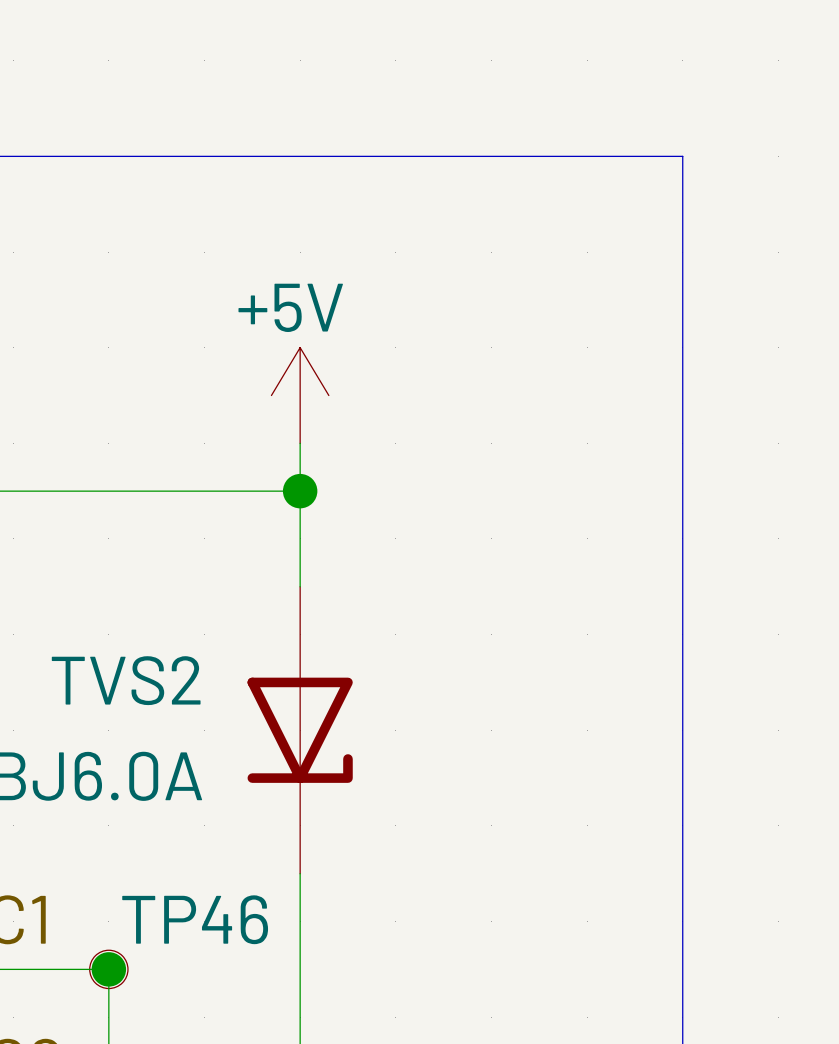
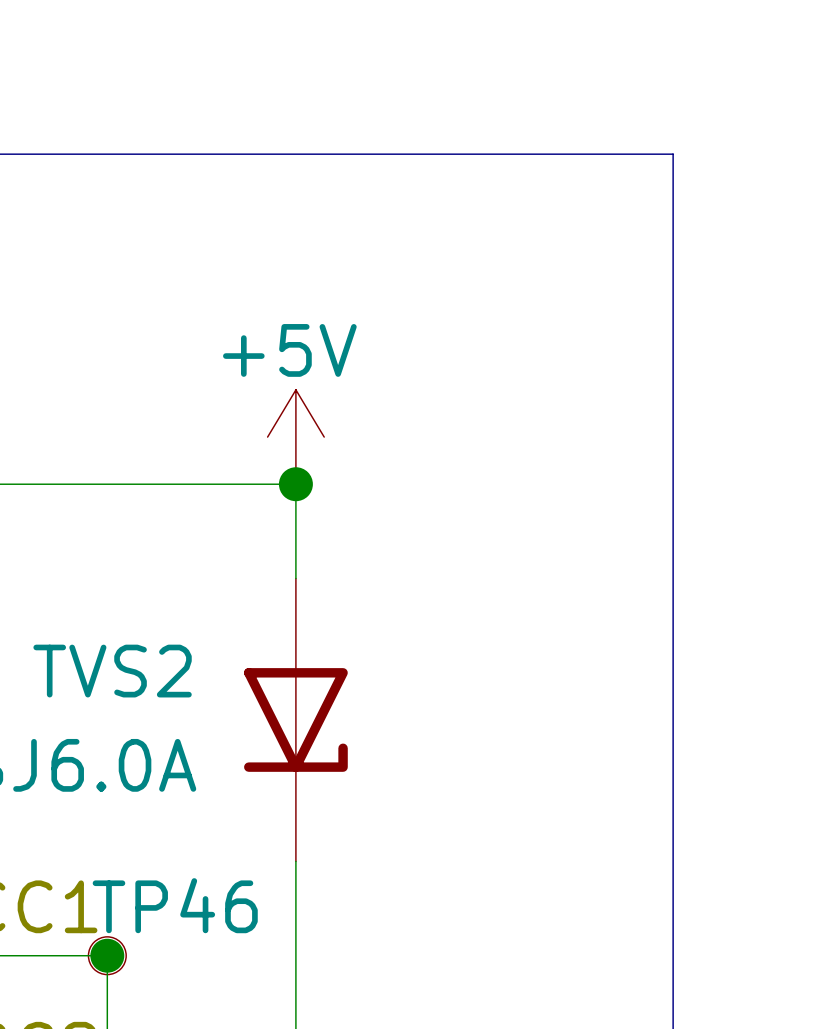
power symbol position: +5V (300, 395) -> +5V (295, 437)

